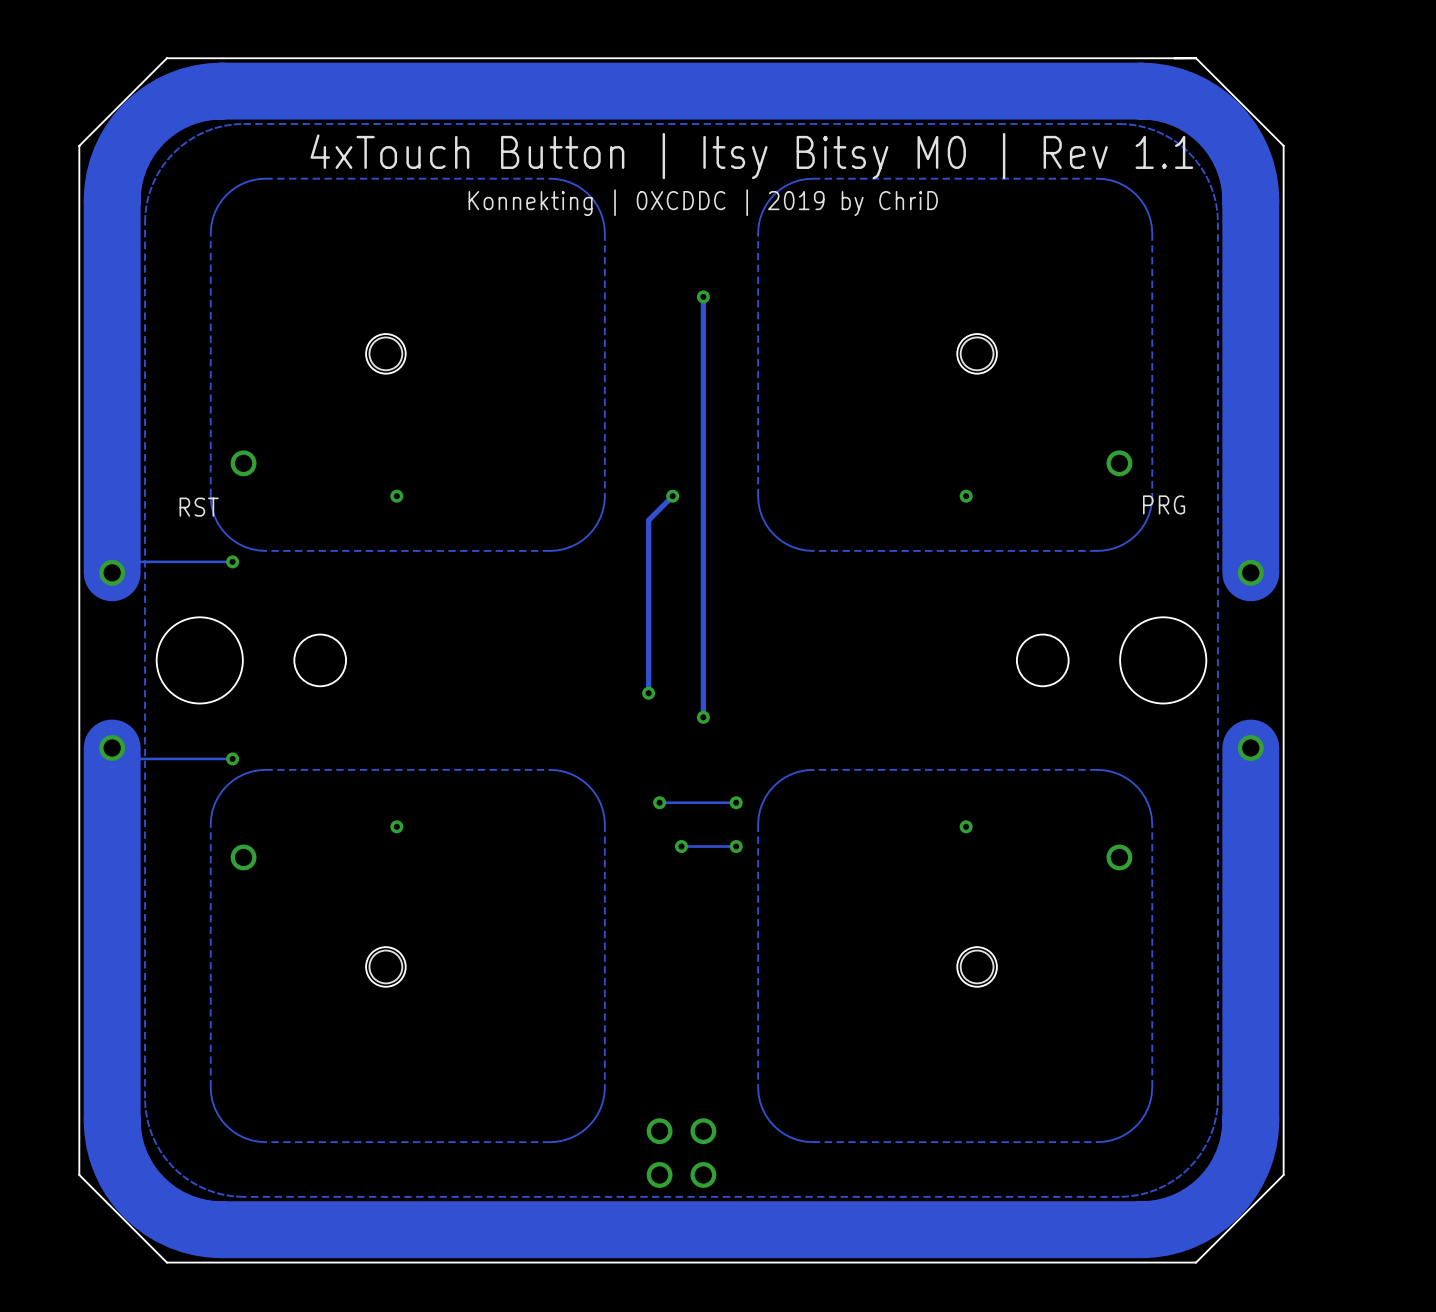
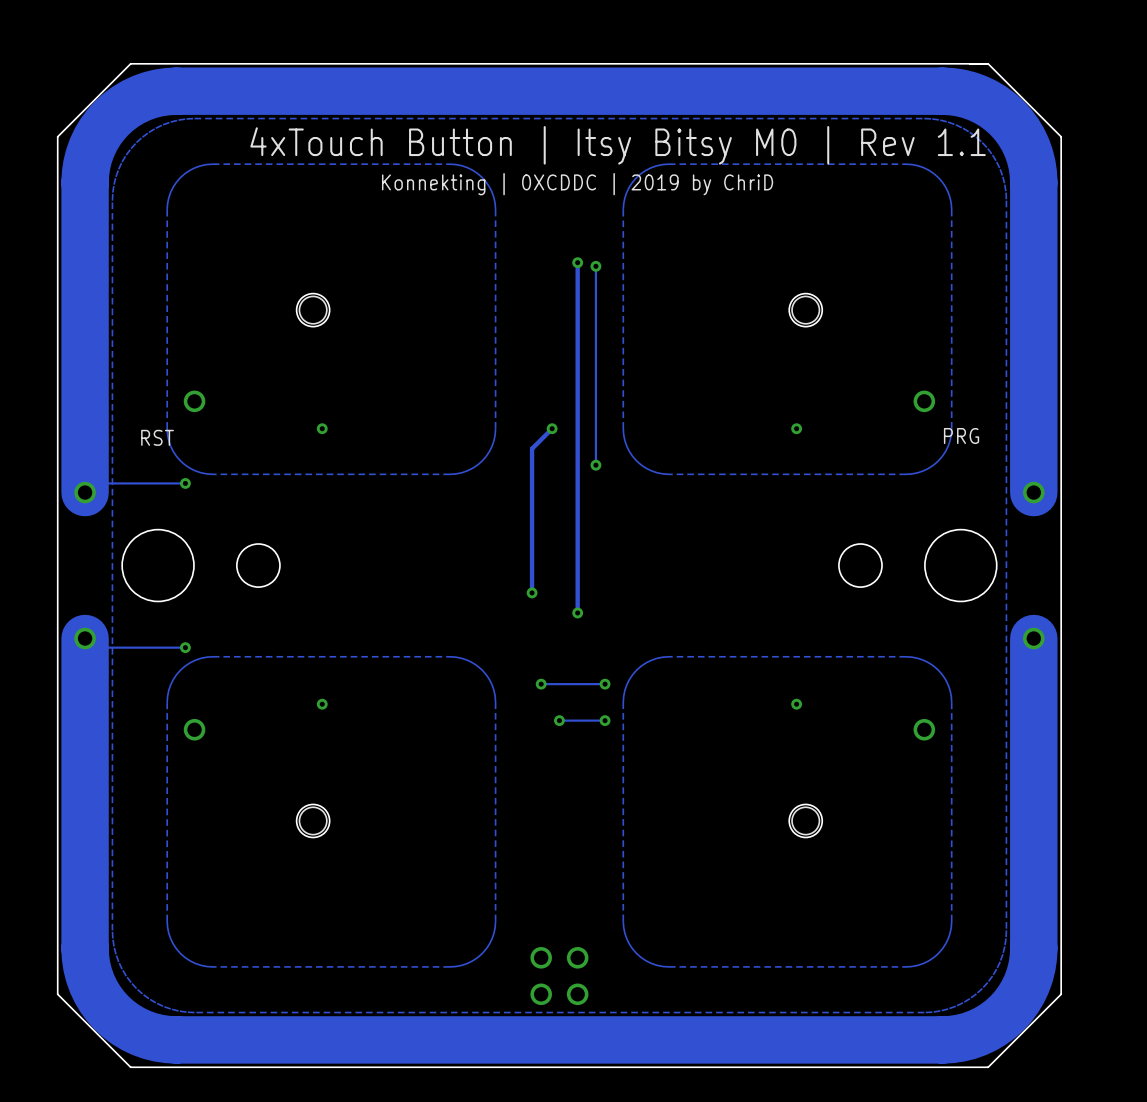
track: none -> (595, 266) (595, 465)
via: none -> (595, 266)
via: none -> (595, 465)

